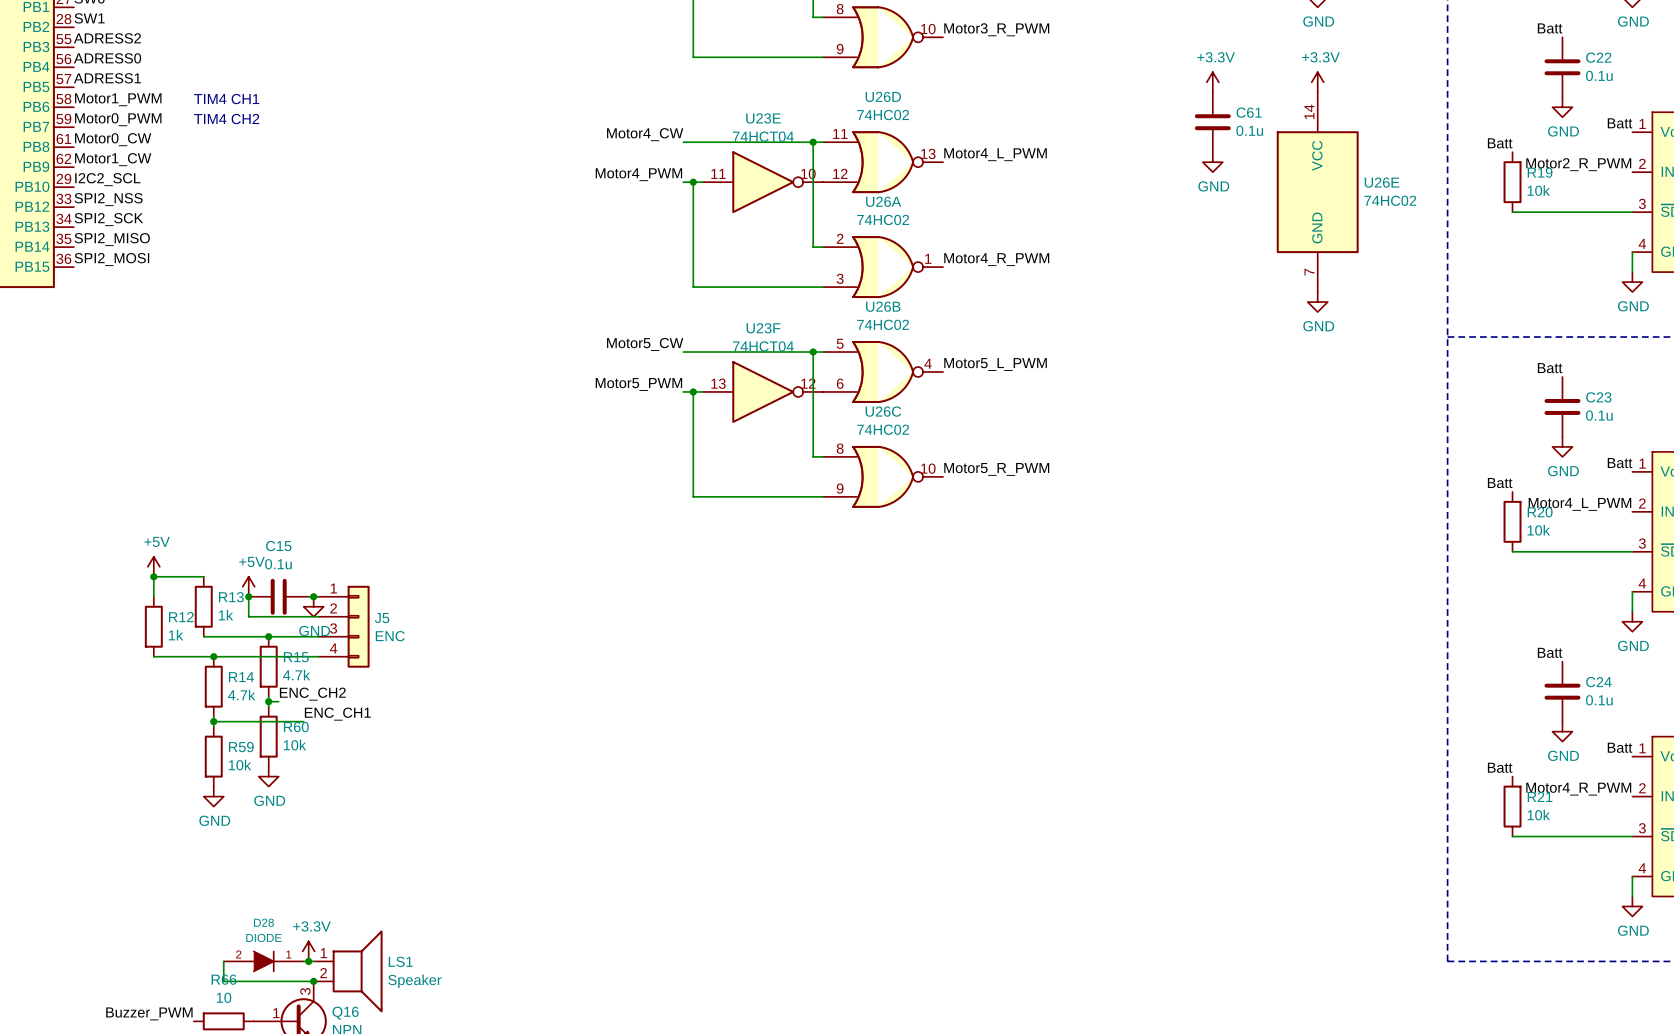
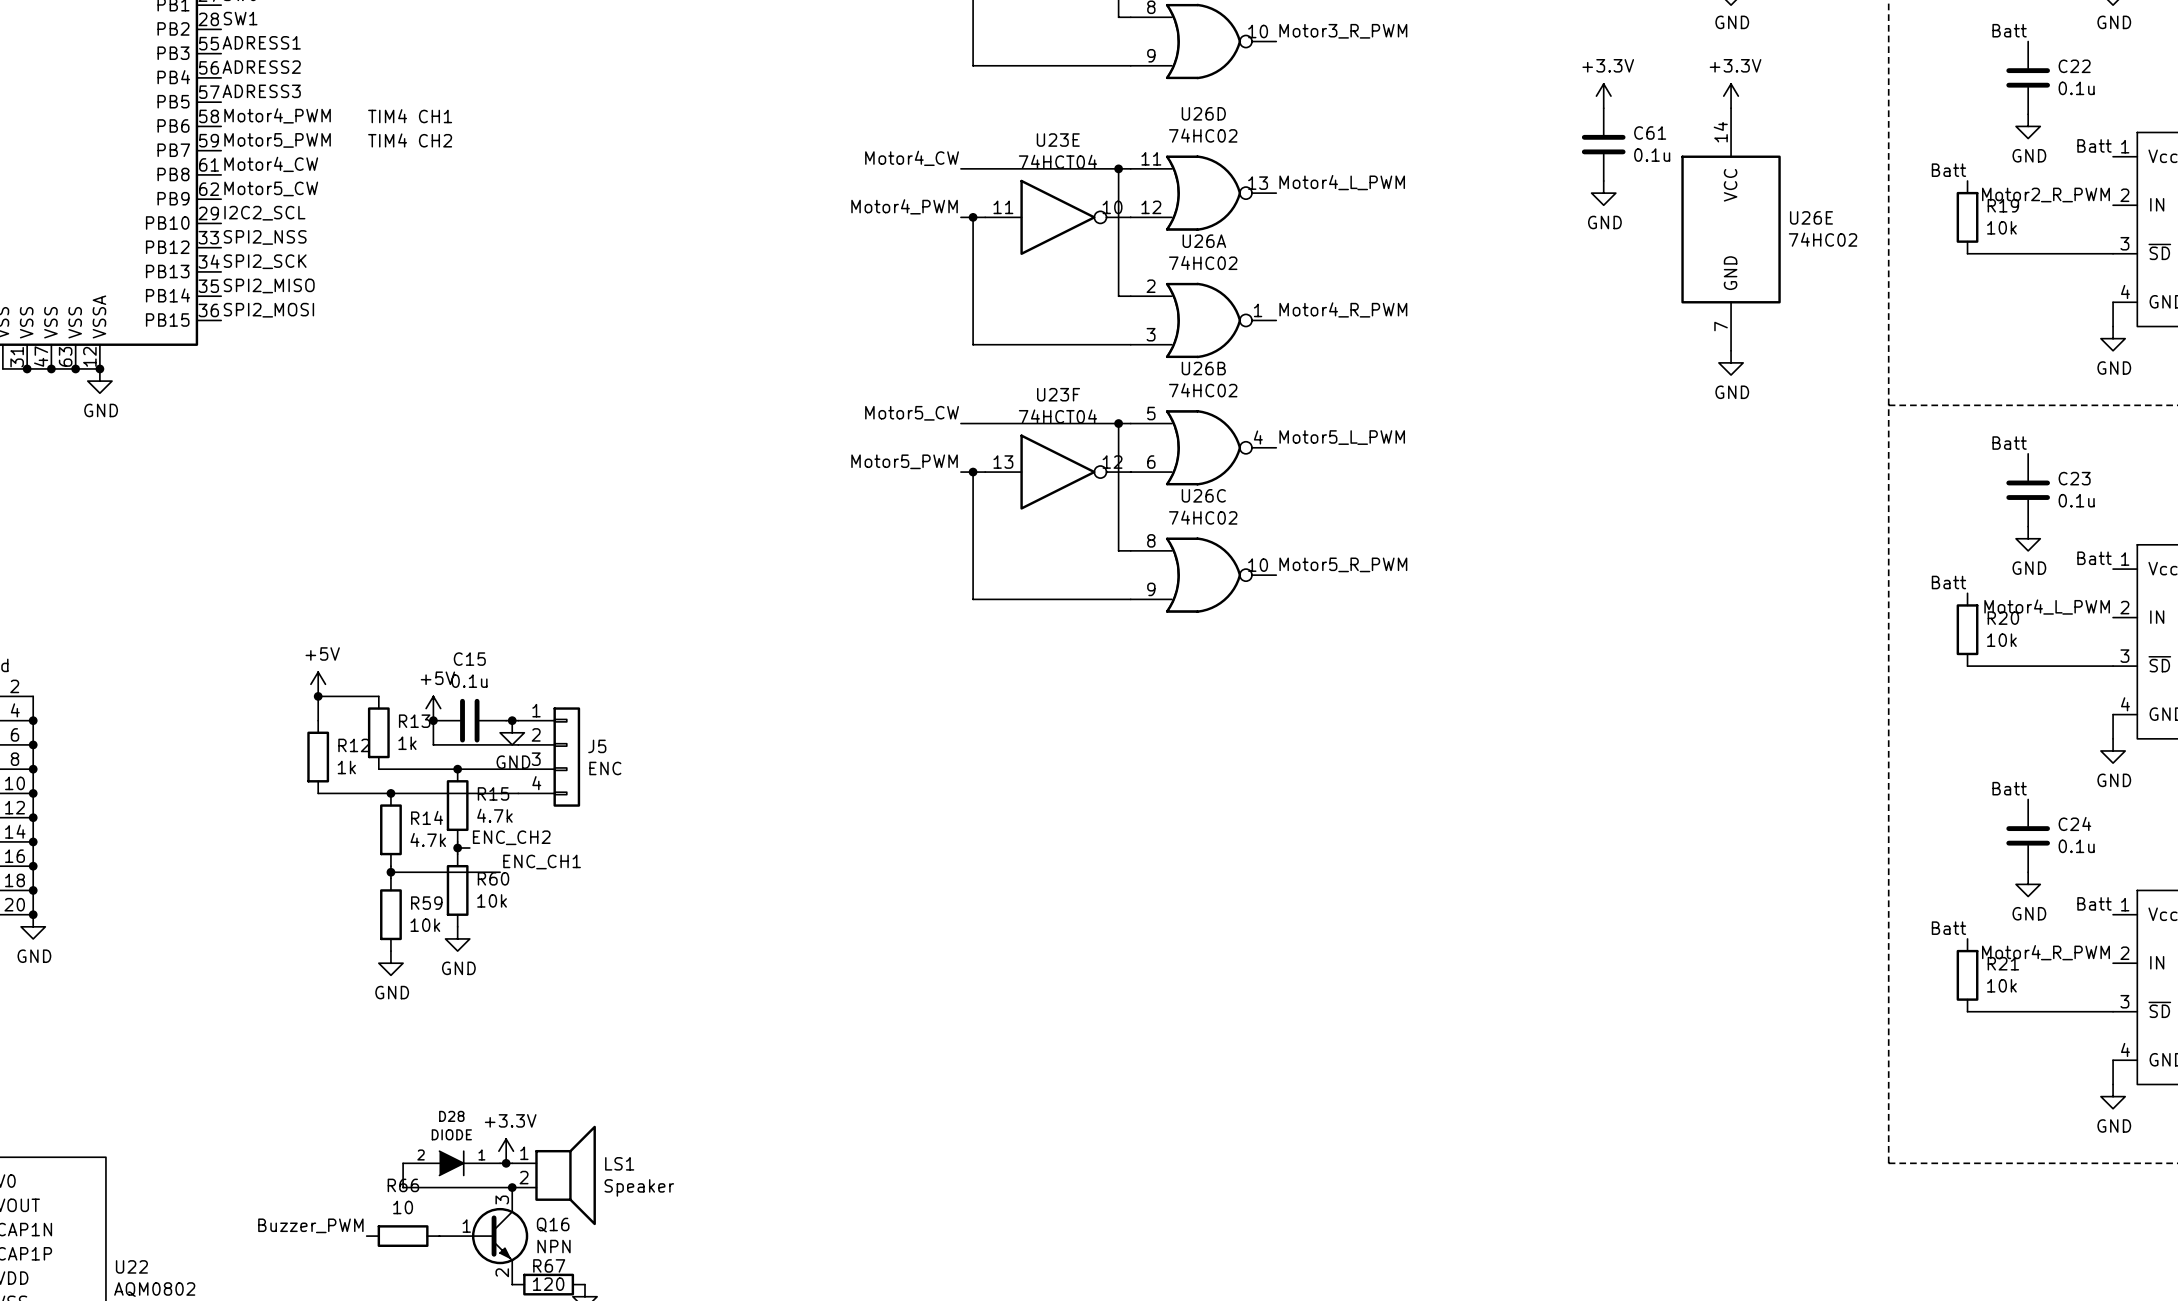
label: ADRESS2 (107, 38) -> ADRESS1 (261, 42)
label: ADRESS0 (107, 58) -> ADRESS2 (261, 67)
label: ADRESS1 (107, 78) -> ADRESS3 (261, 91)
label: Motor1_PWM (118, 99) -> Motor4_PWM (277, 115)
label: Motor0_PWM (118, 119) -> Motor5_PWM (277, 140)
label: Motor0_CW (113, 139) -> Motor4_CW (271, 164)
label: Motor1_CW (113, 159) -> Motor5_CW (271, 188)

